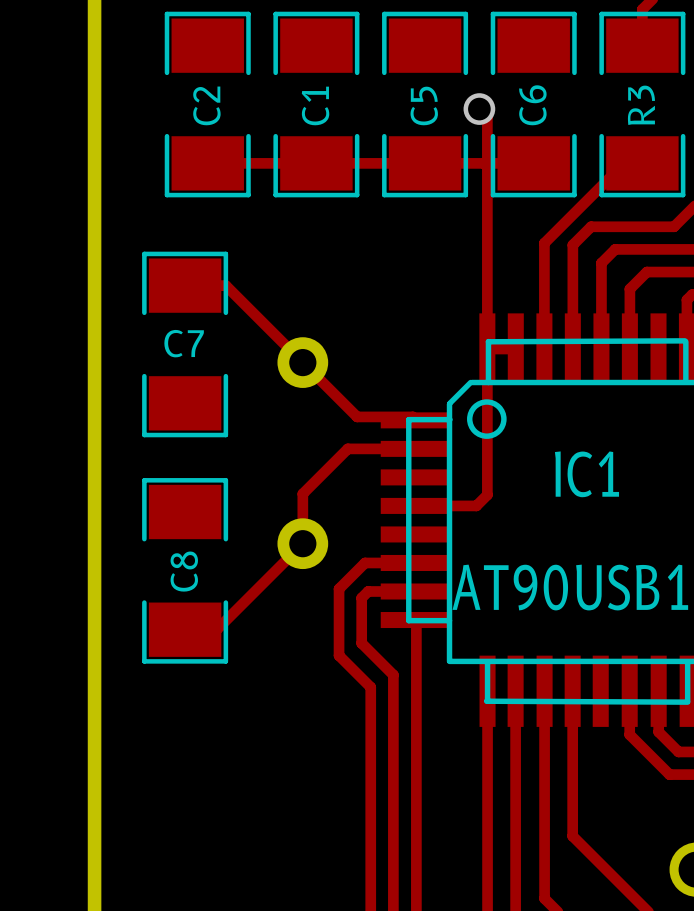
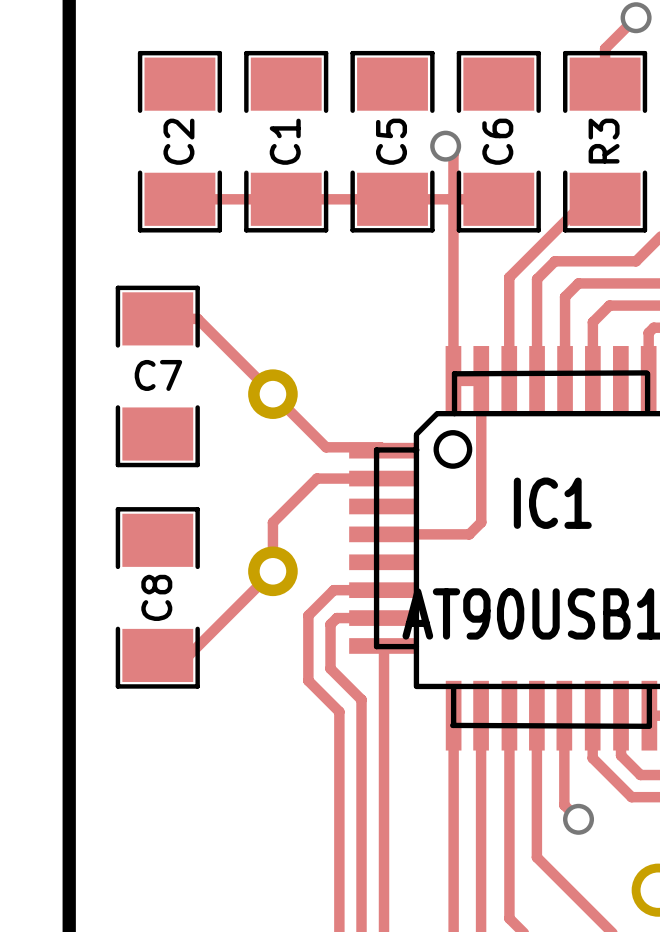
track: (487, 349) (487, 494) (476, 505) -> (481, 380) (481, 522) (469, 534) (442, 534)
track: none -> (564, 715) (564, 805) (578, 819)
via: none -> (578, 819)

